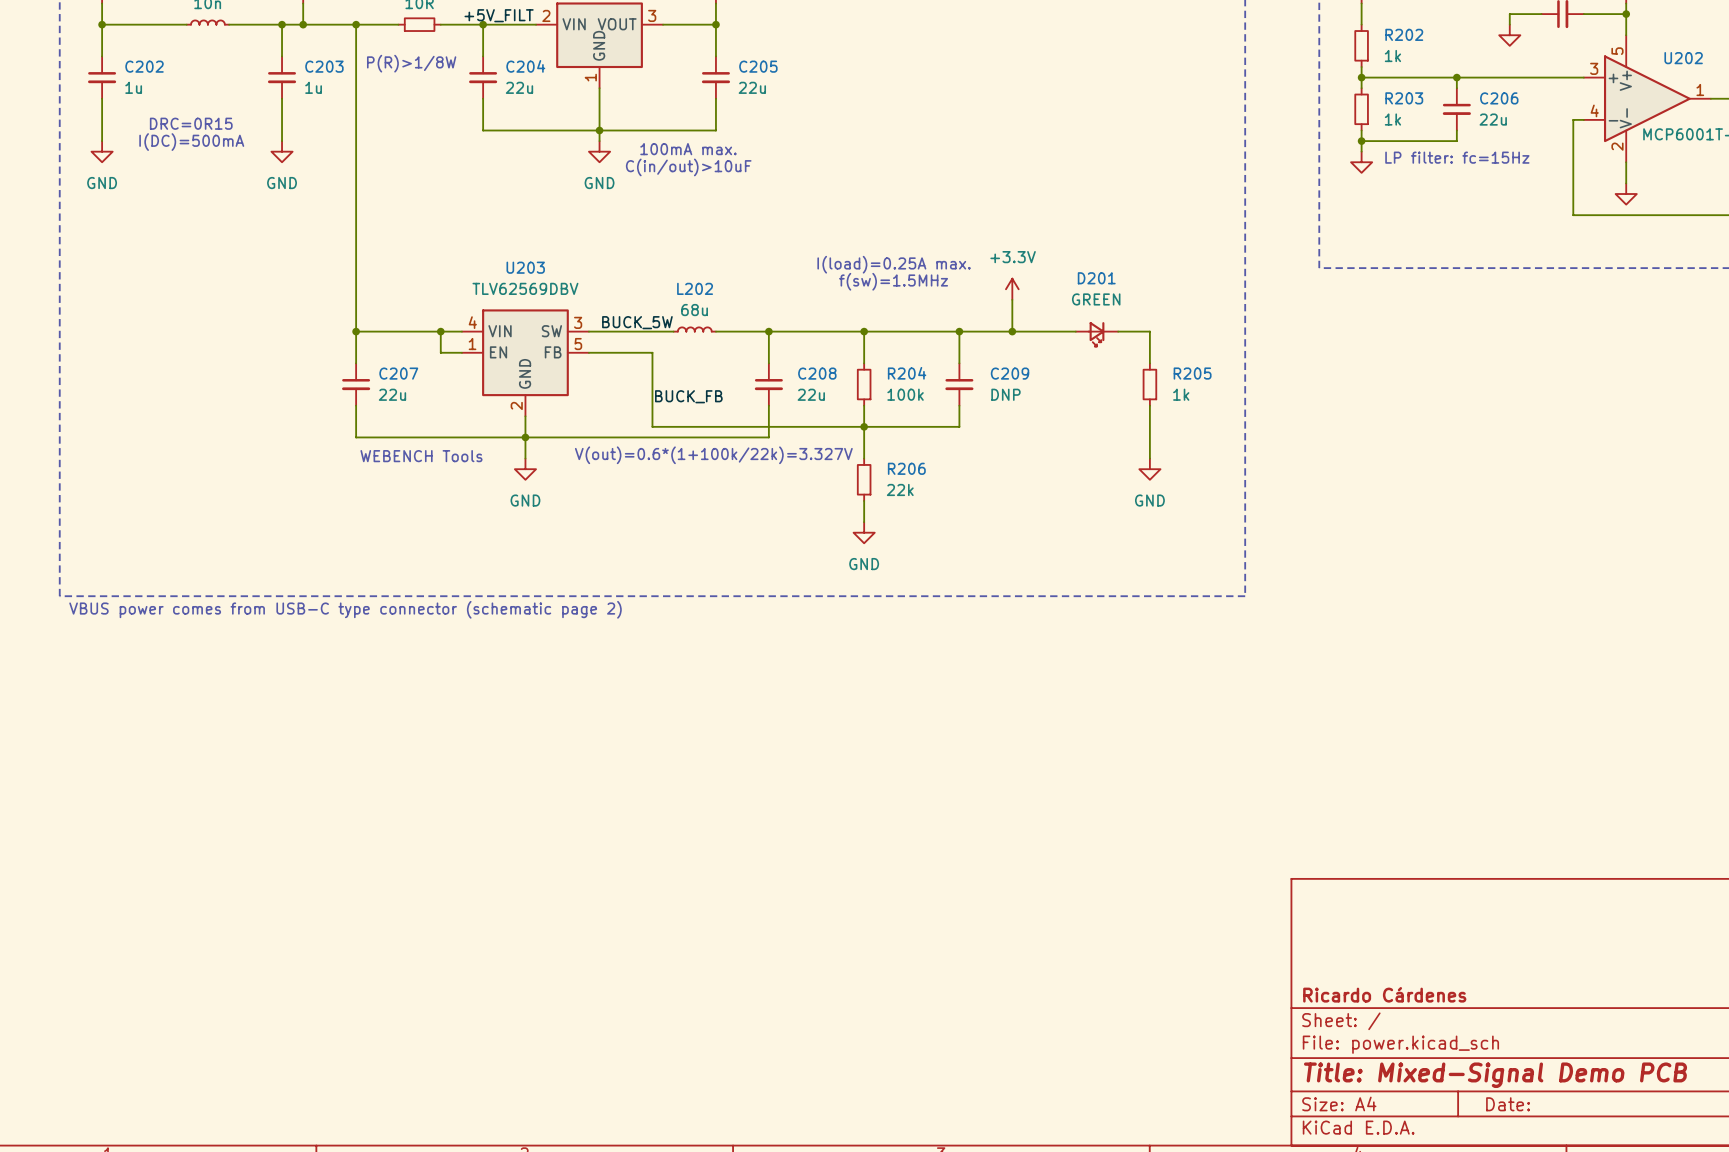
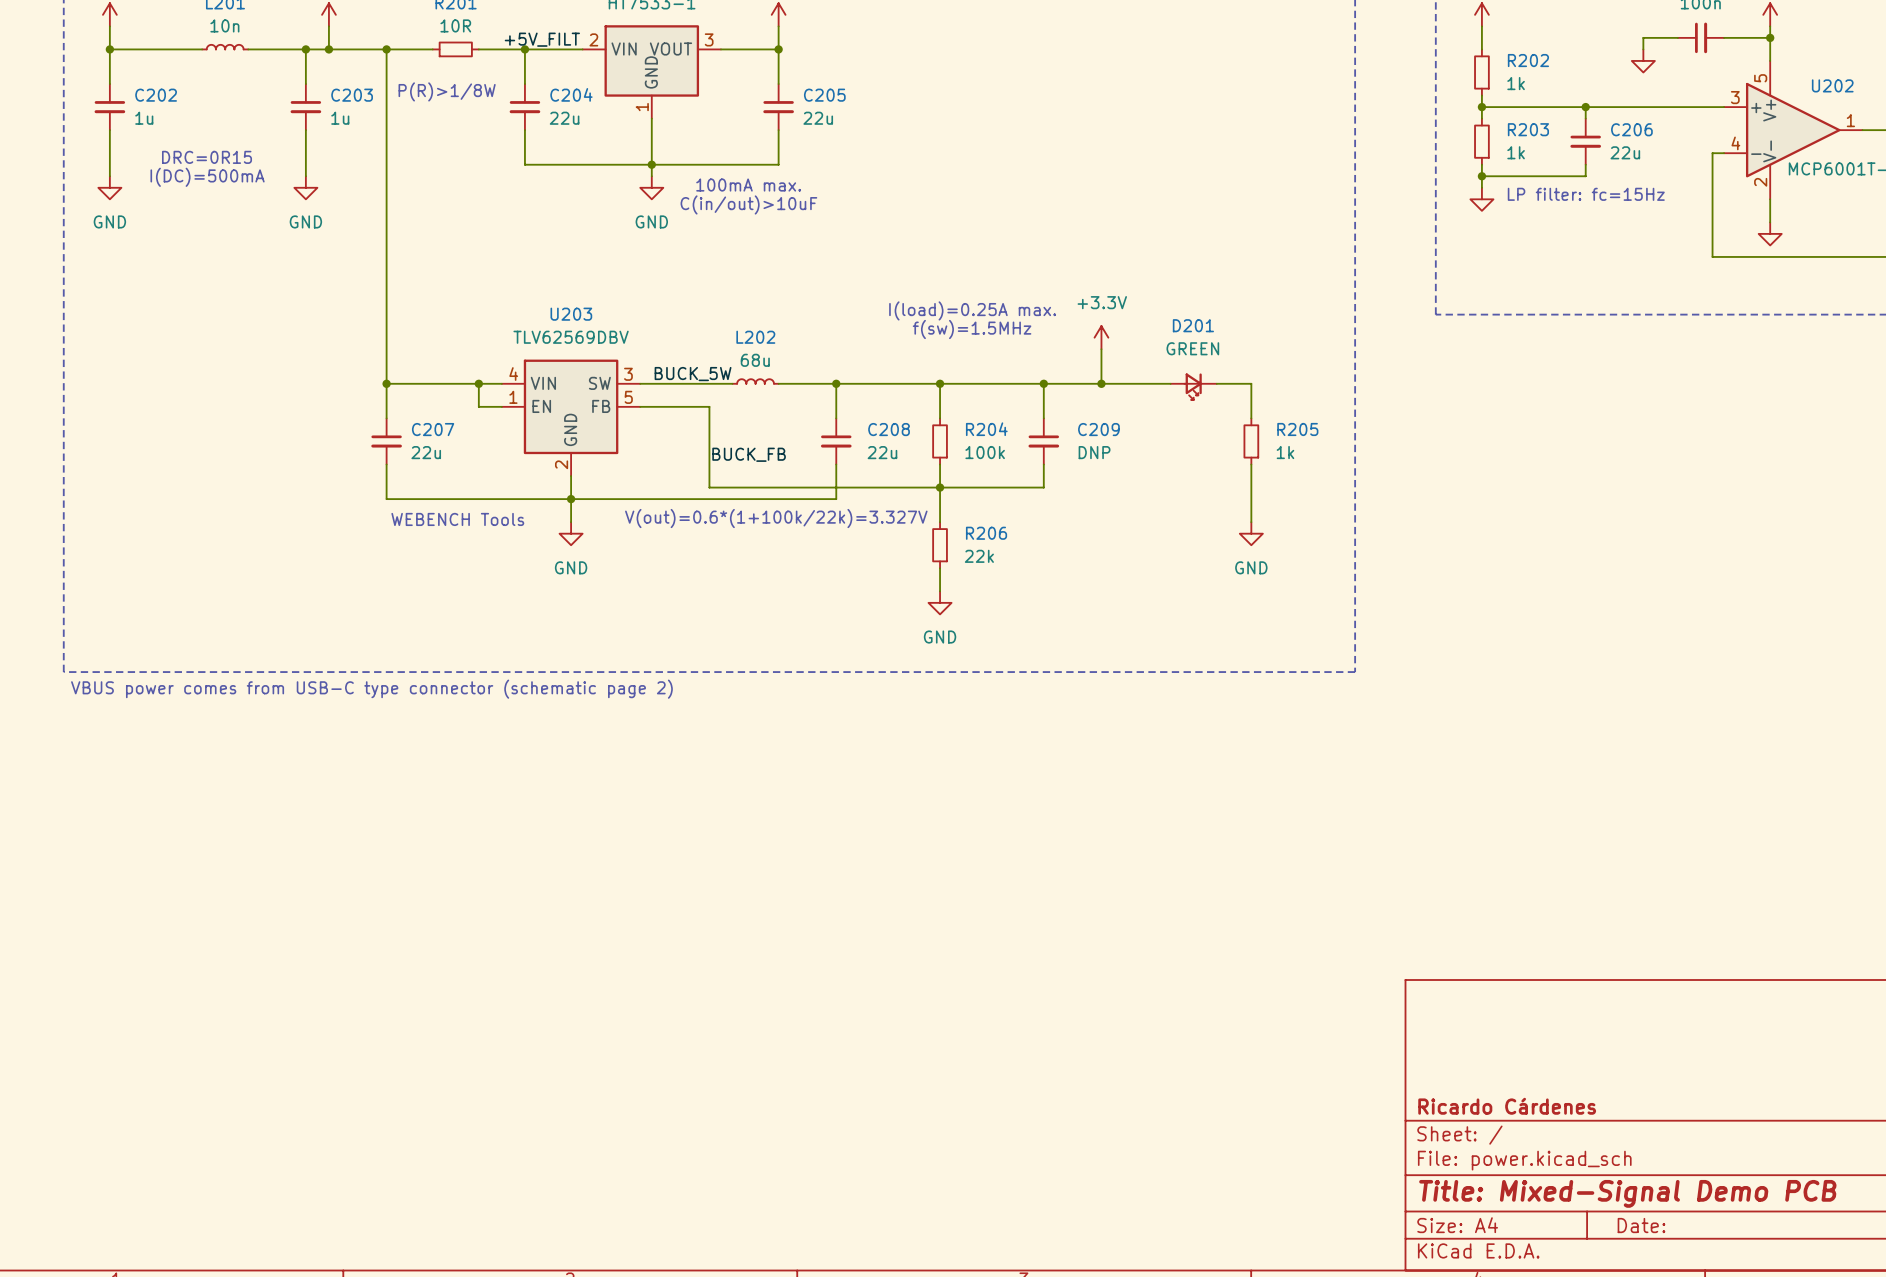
text: VBUS power comes from USB-C type connector (schematic page 2) (345, 609) -> none
text: none -> VBUS power comes from USB-C type connector (schematic page 2) (371, 689)

